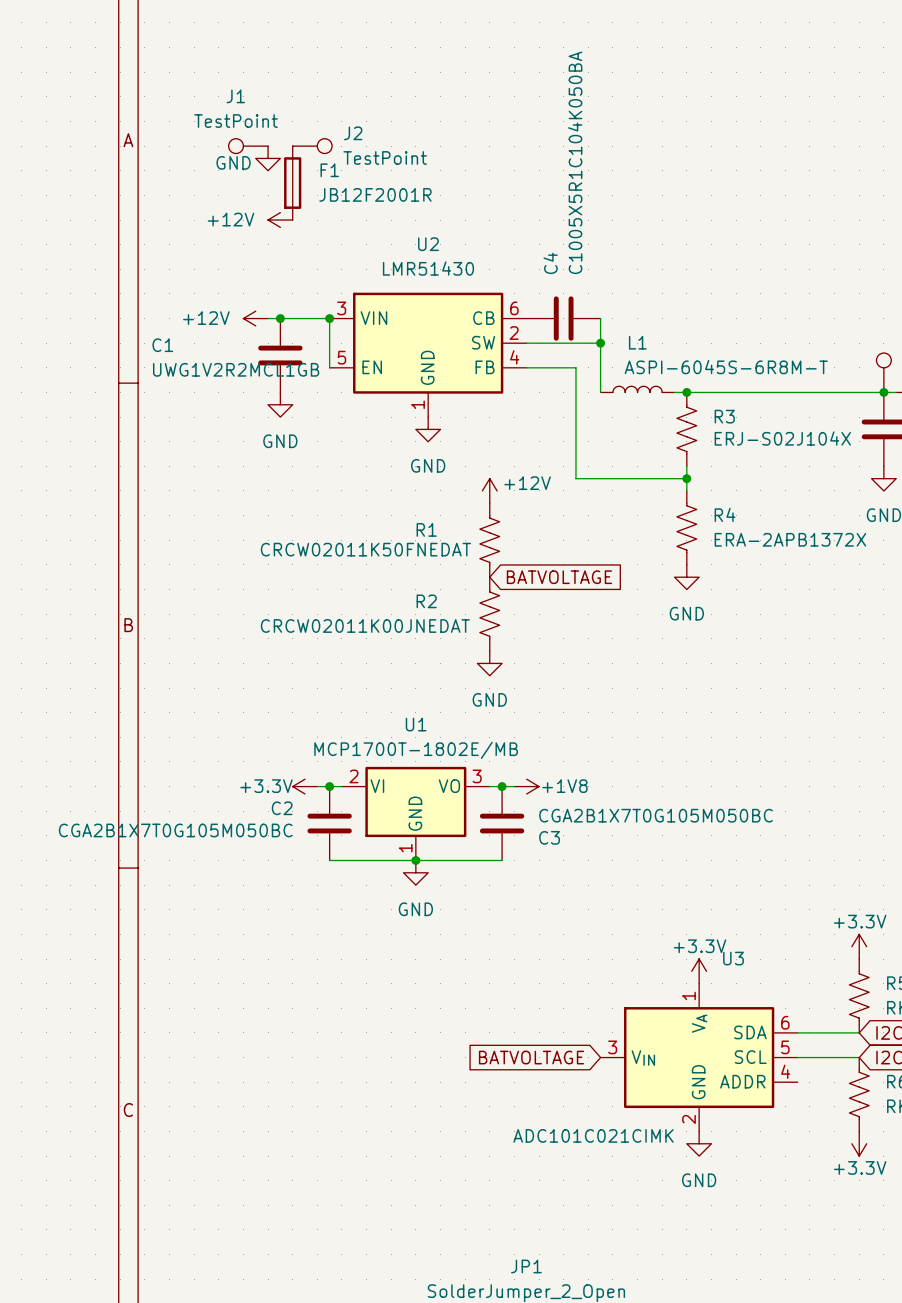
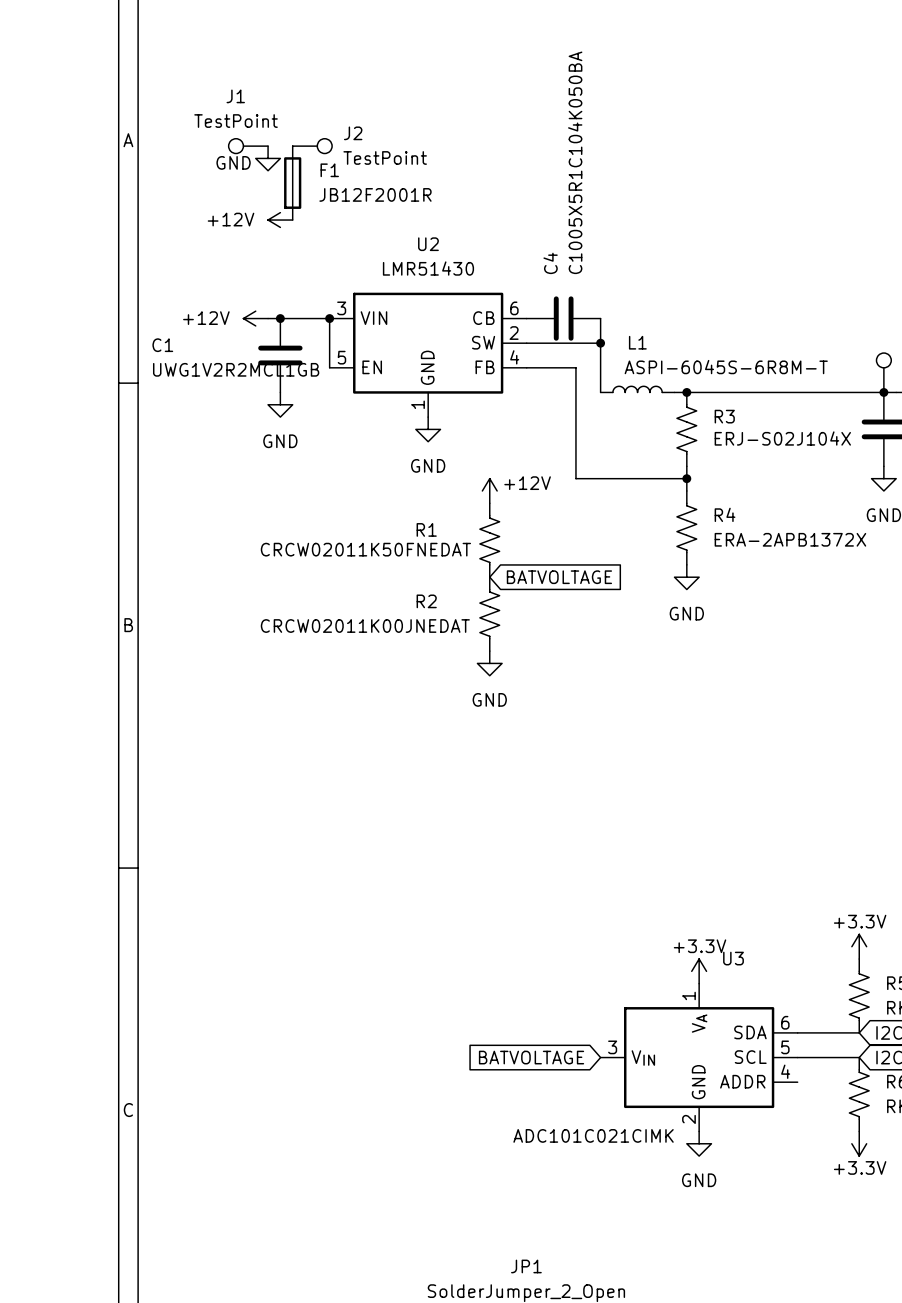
power symbol: +3.3V (305, 786) -> none
wire: (317, 786) (341, 786) -> none
junction: (329, 786) -> none
wire: (489, 786) (514, 786) -> none
junction: (502, 786) -> none
power symbol: +1V8 (526, 786) -> none
U1: MCP1700T-1802E/MB (415, 813) -> none
C2: CGA2B1X7T0G105M050BC (329, 823) -> none
C3: CGA2B1X7T0G105M050BC (502, 823) -> none
wire: (329, 860) (502, 860) -> none
junction: (415, 860) -> none
power symbol: GND (415, 872) -> none

